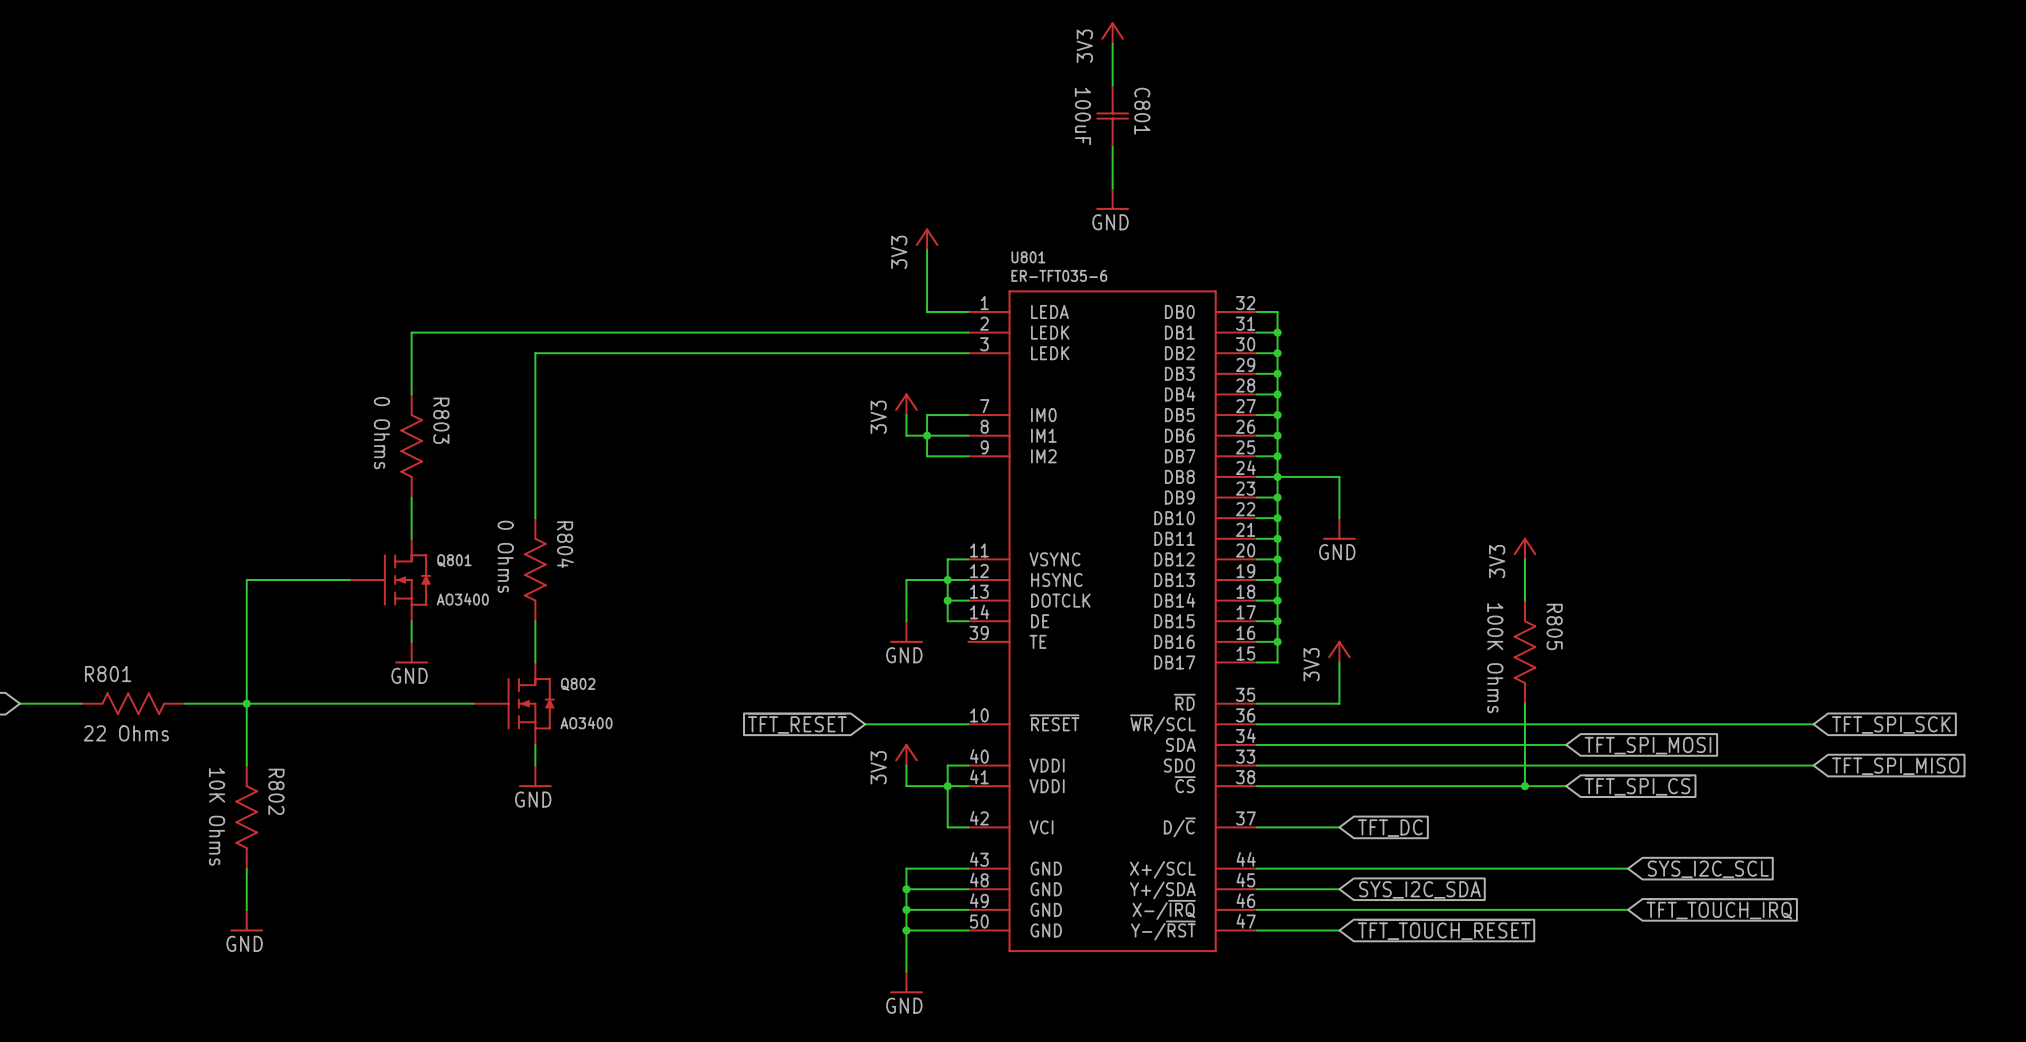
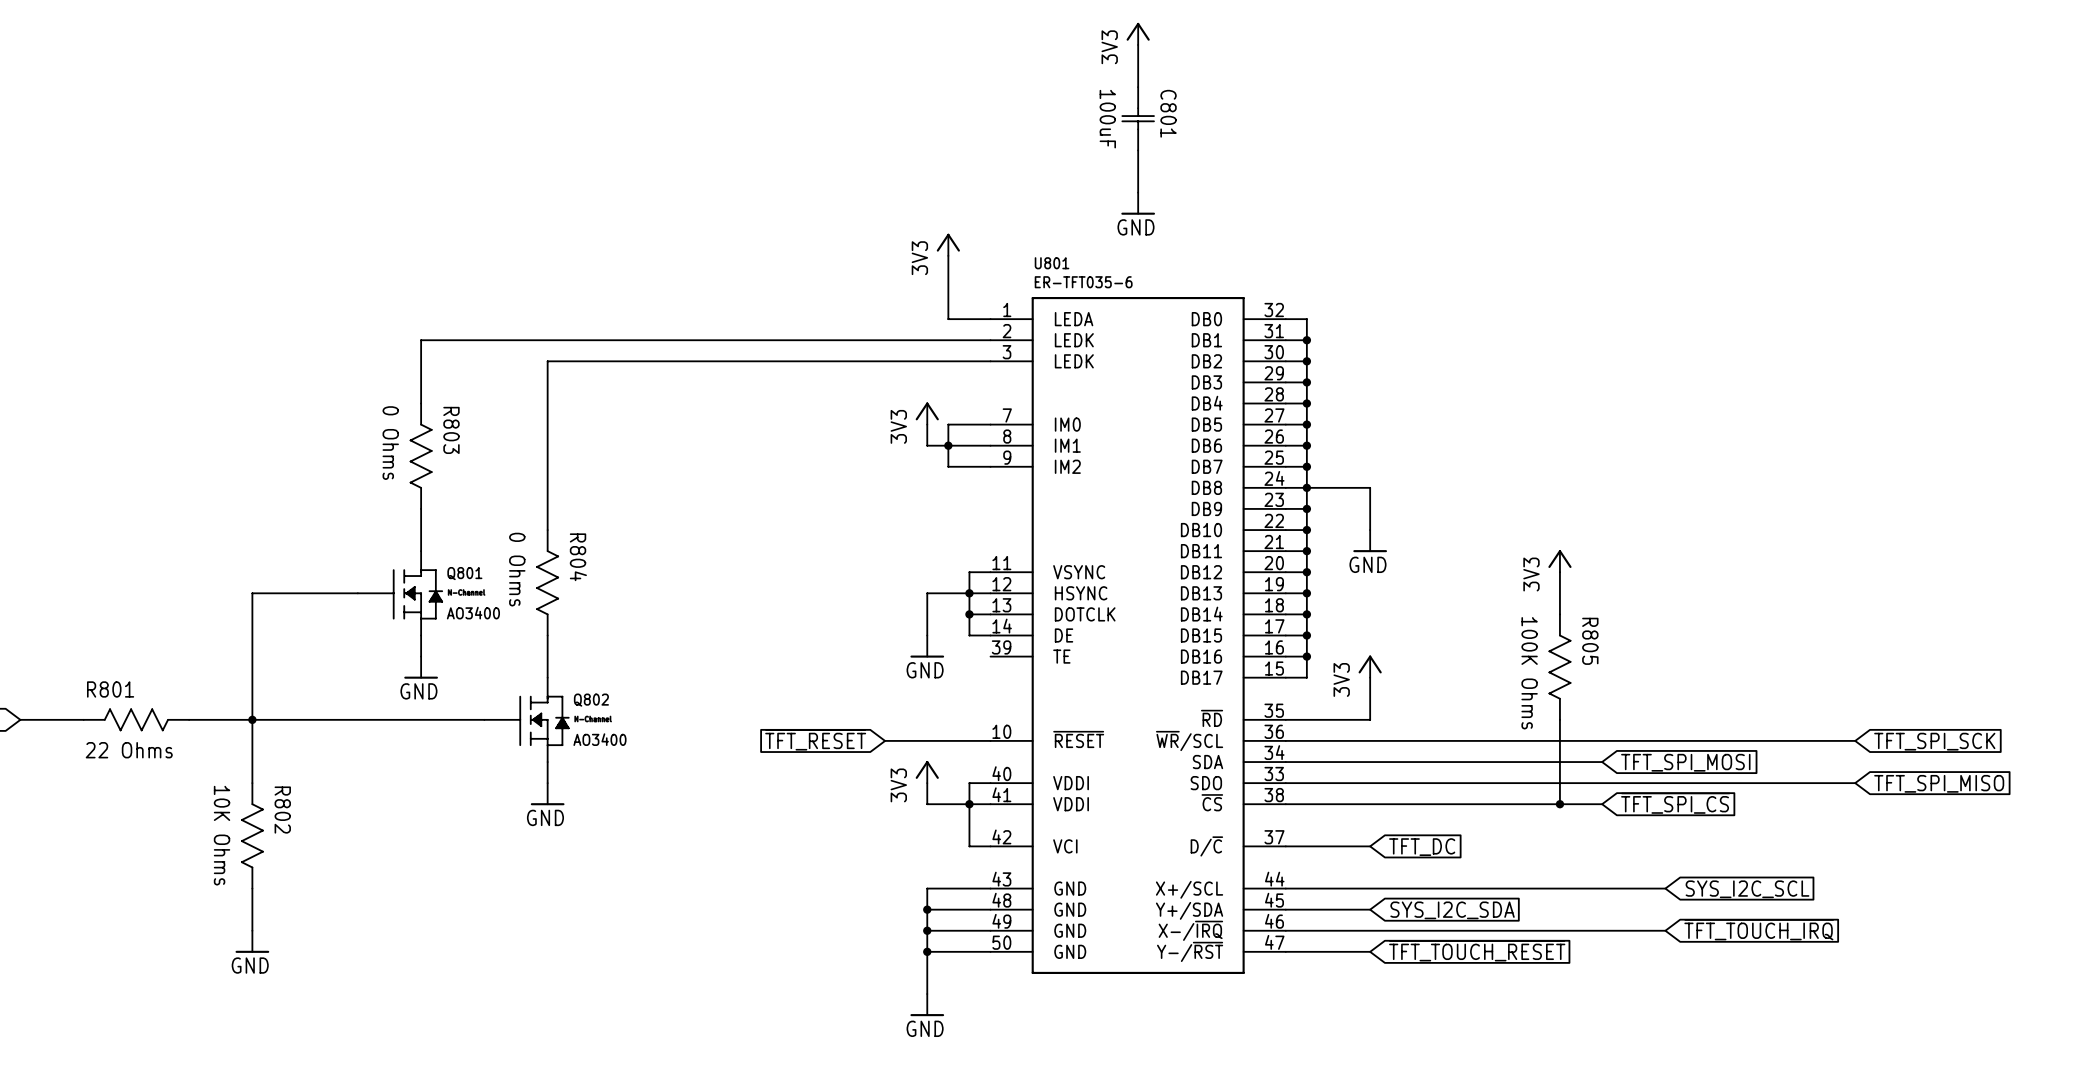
Q801 symbol: [349, 538, 431, 622] -> [357, 550, 443, 637]
Q802 symbol: [472, 661, 555, 746] -> [483, 677, 570, 763]

